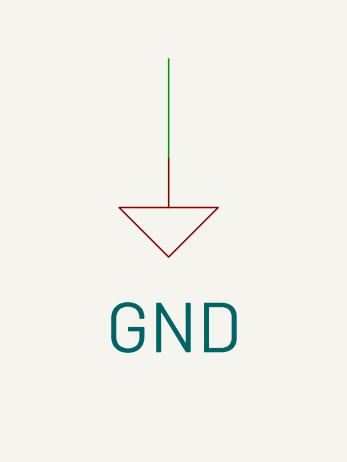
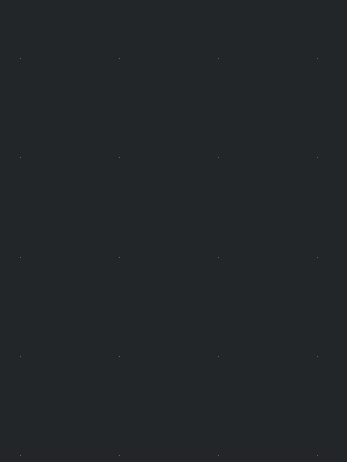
wire: (168, 58) (168, 157) -> none
power symbol: GND (168, 207) -> none

